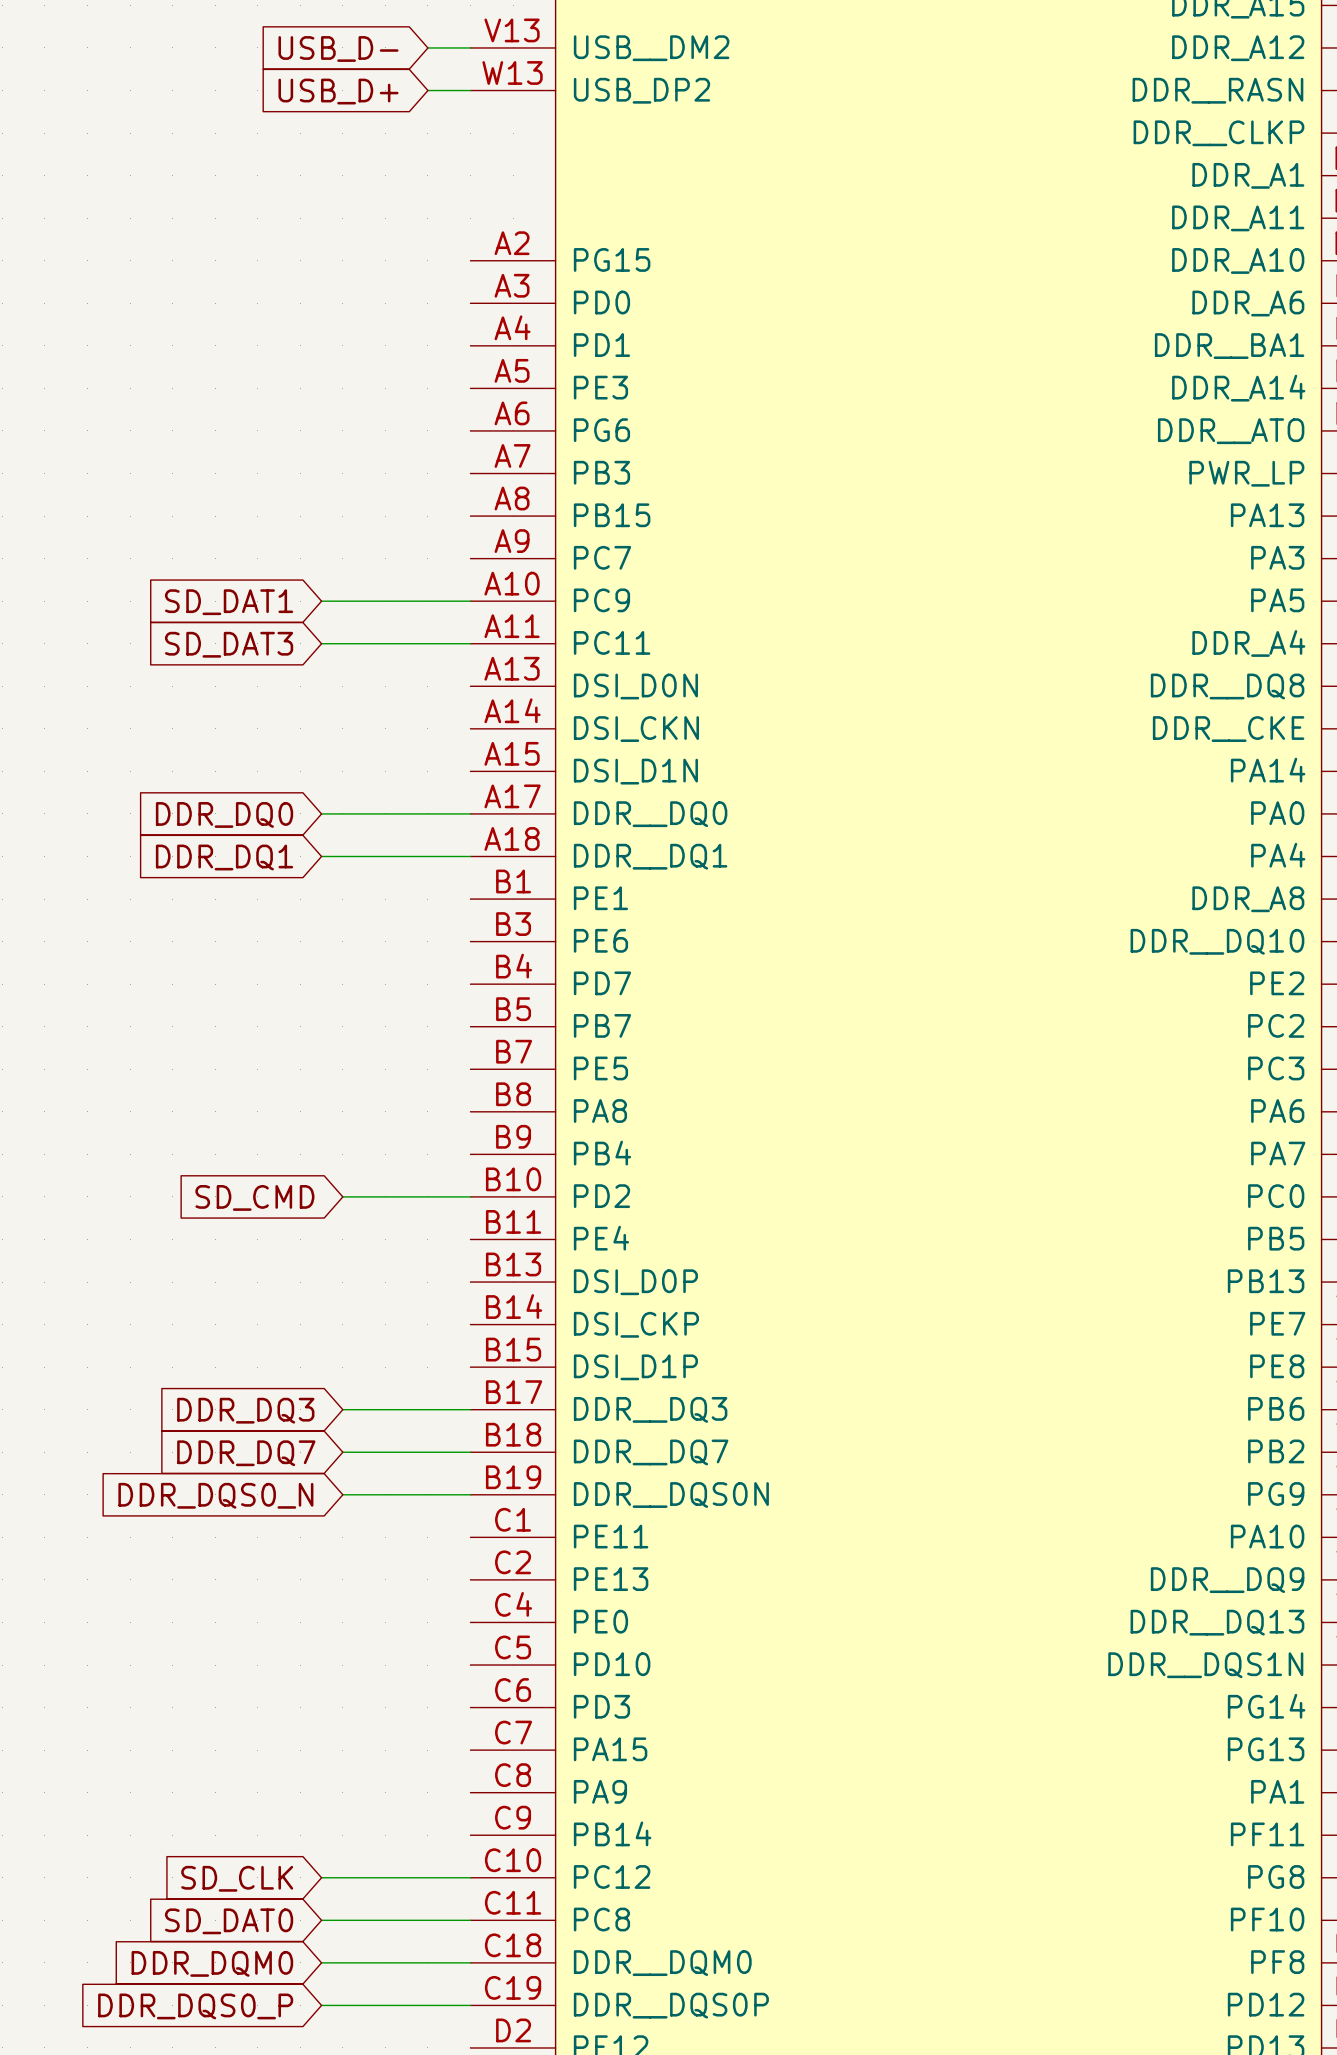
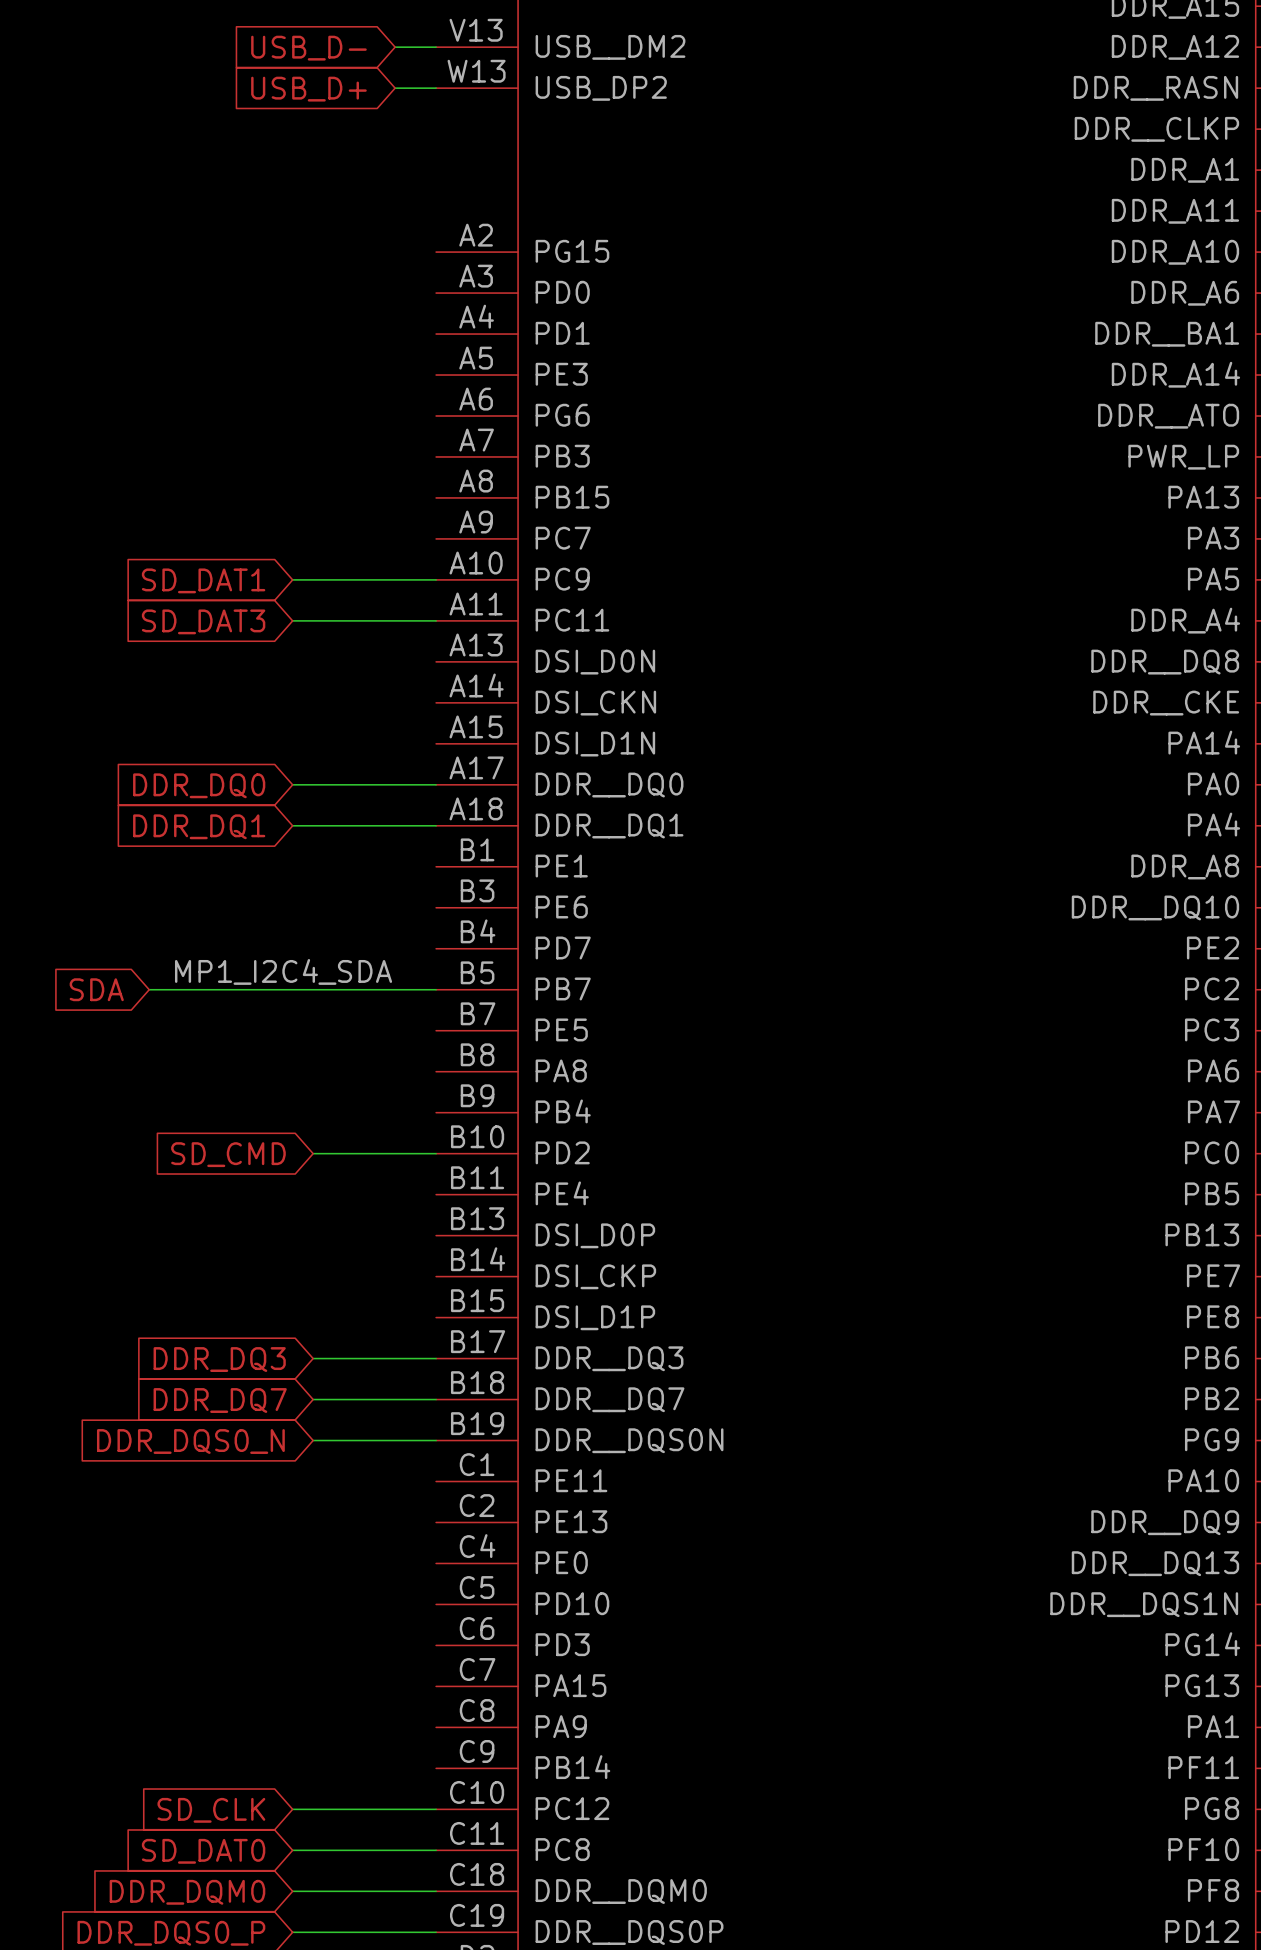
label: none -> MP1_I2C4_SDA (283, 971)
global label: none -> SDA (96, 989)
wire: none -> (149, 989) (436, 989)

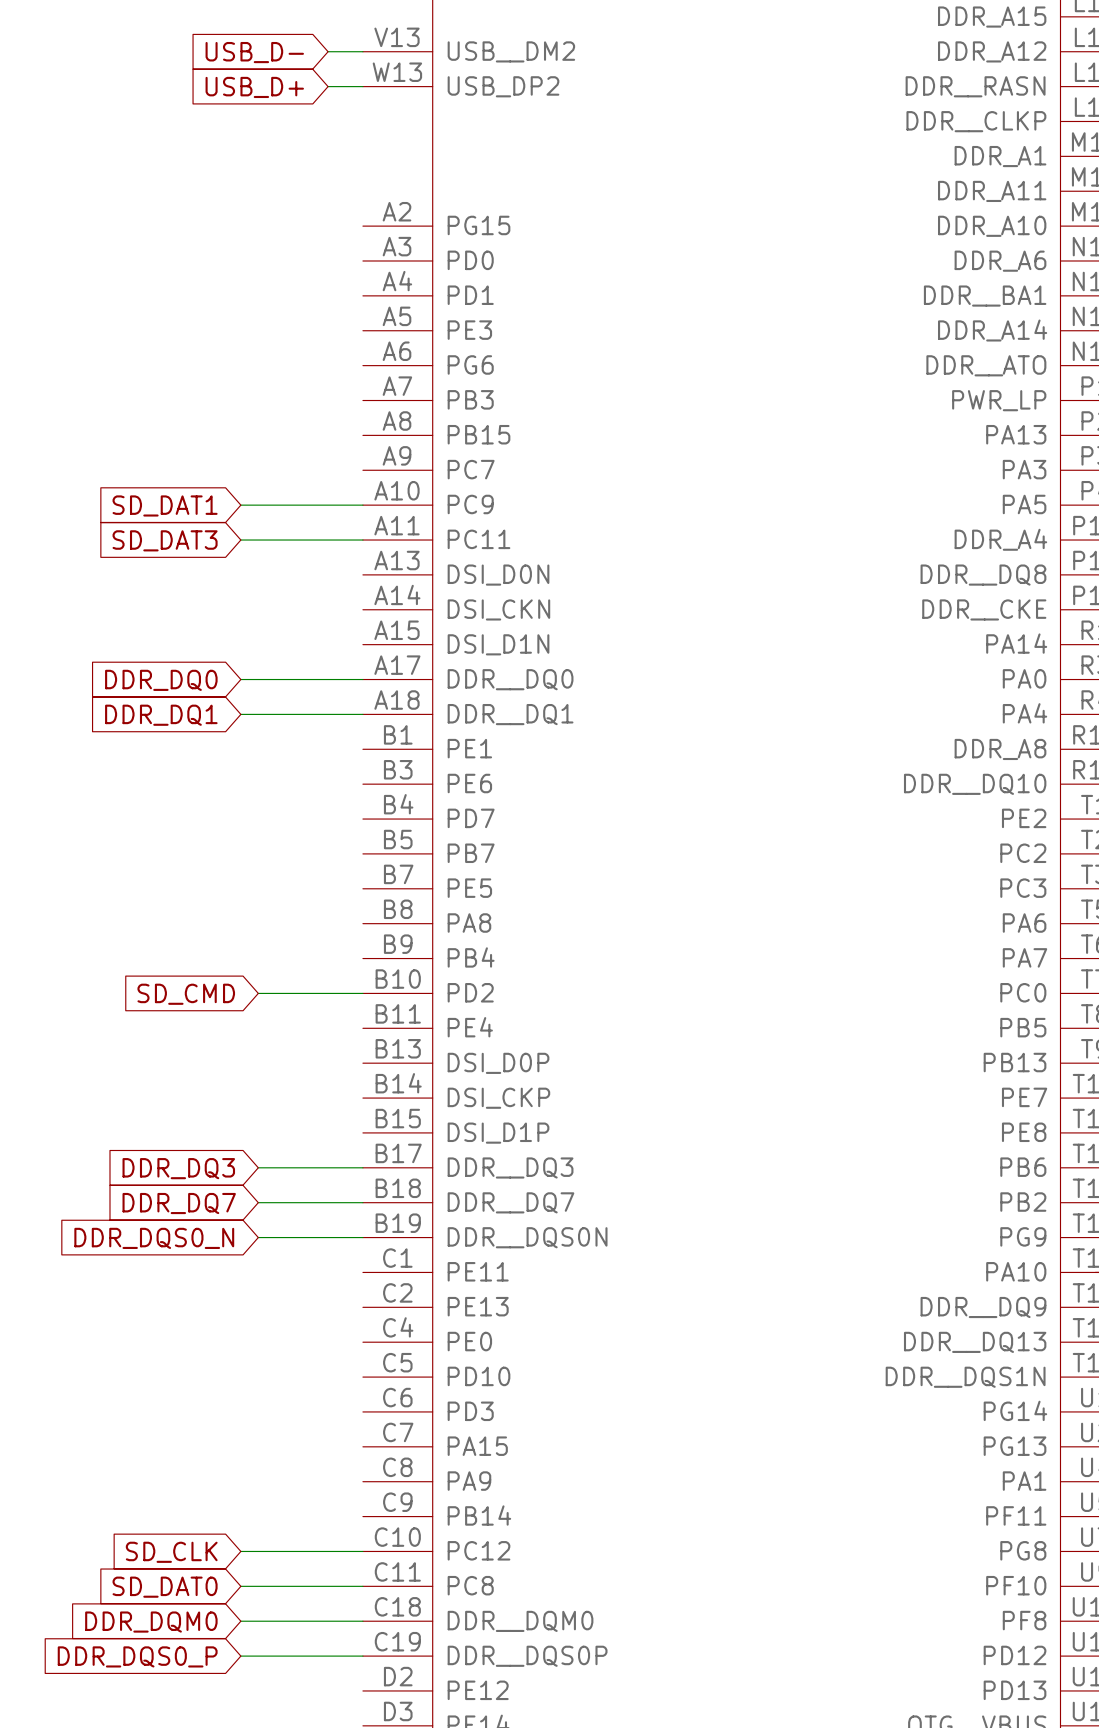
label: MP1_I2C4_SDA (283, 971) -> none
global label: SDA (96, 989) -> none
wire: (149, 989) (436, 989) -> none

